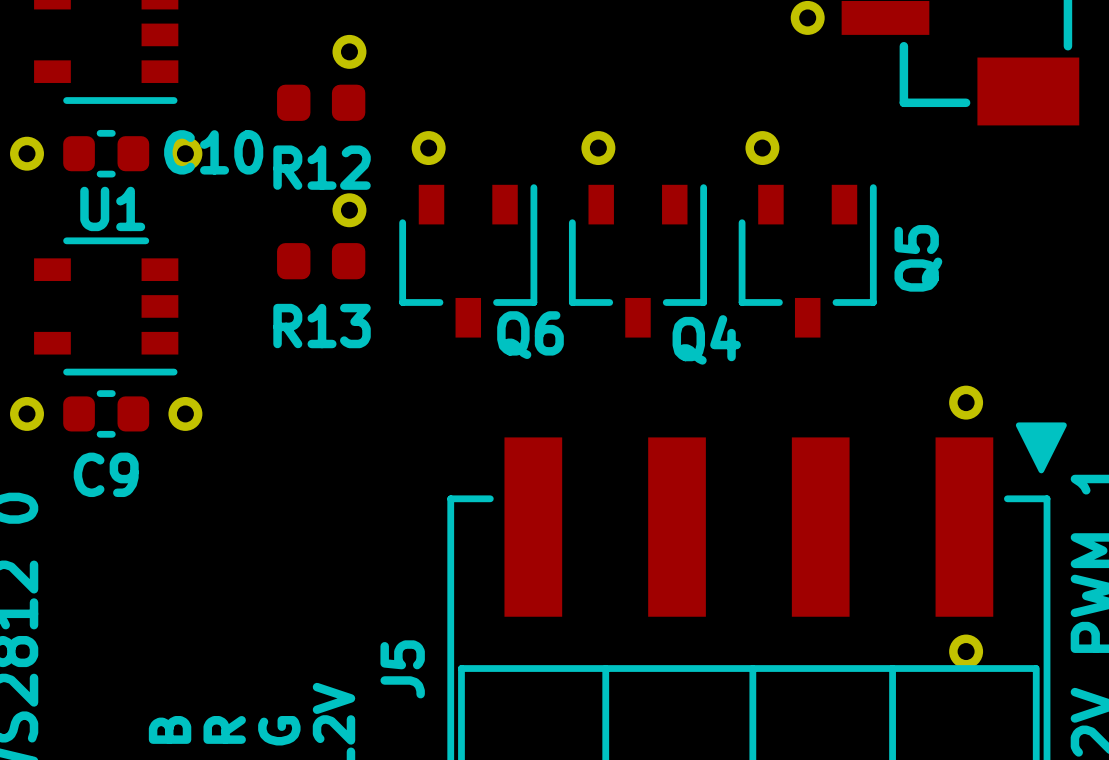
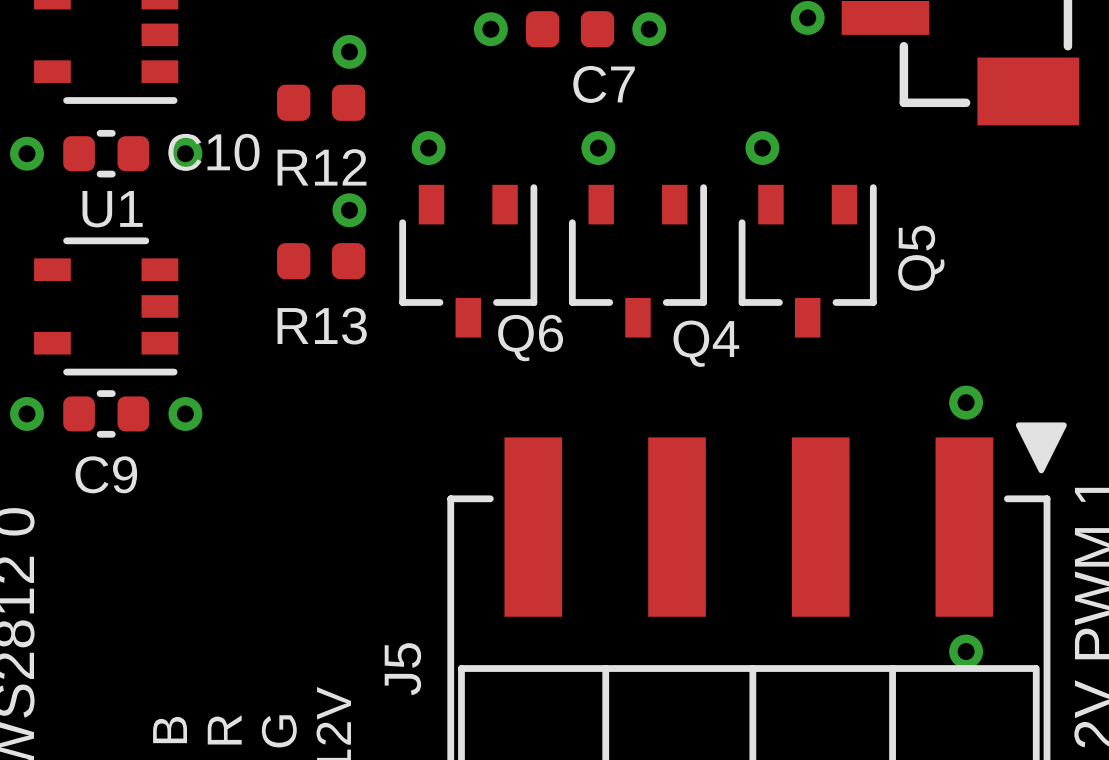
part: none -> (490, 29)
C7: none -> (570, 29)
part: none -> (649, 29)

